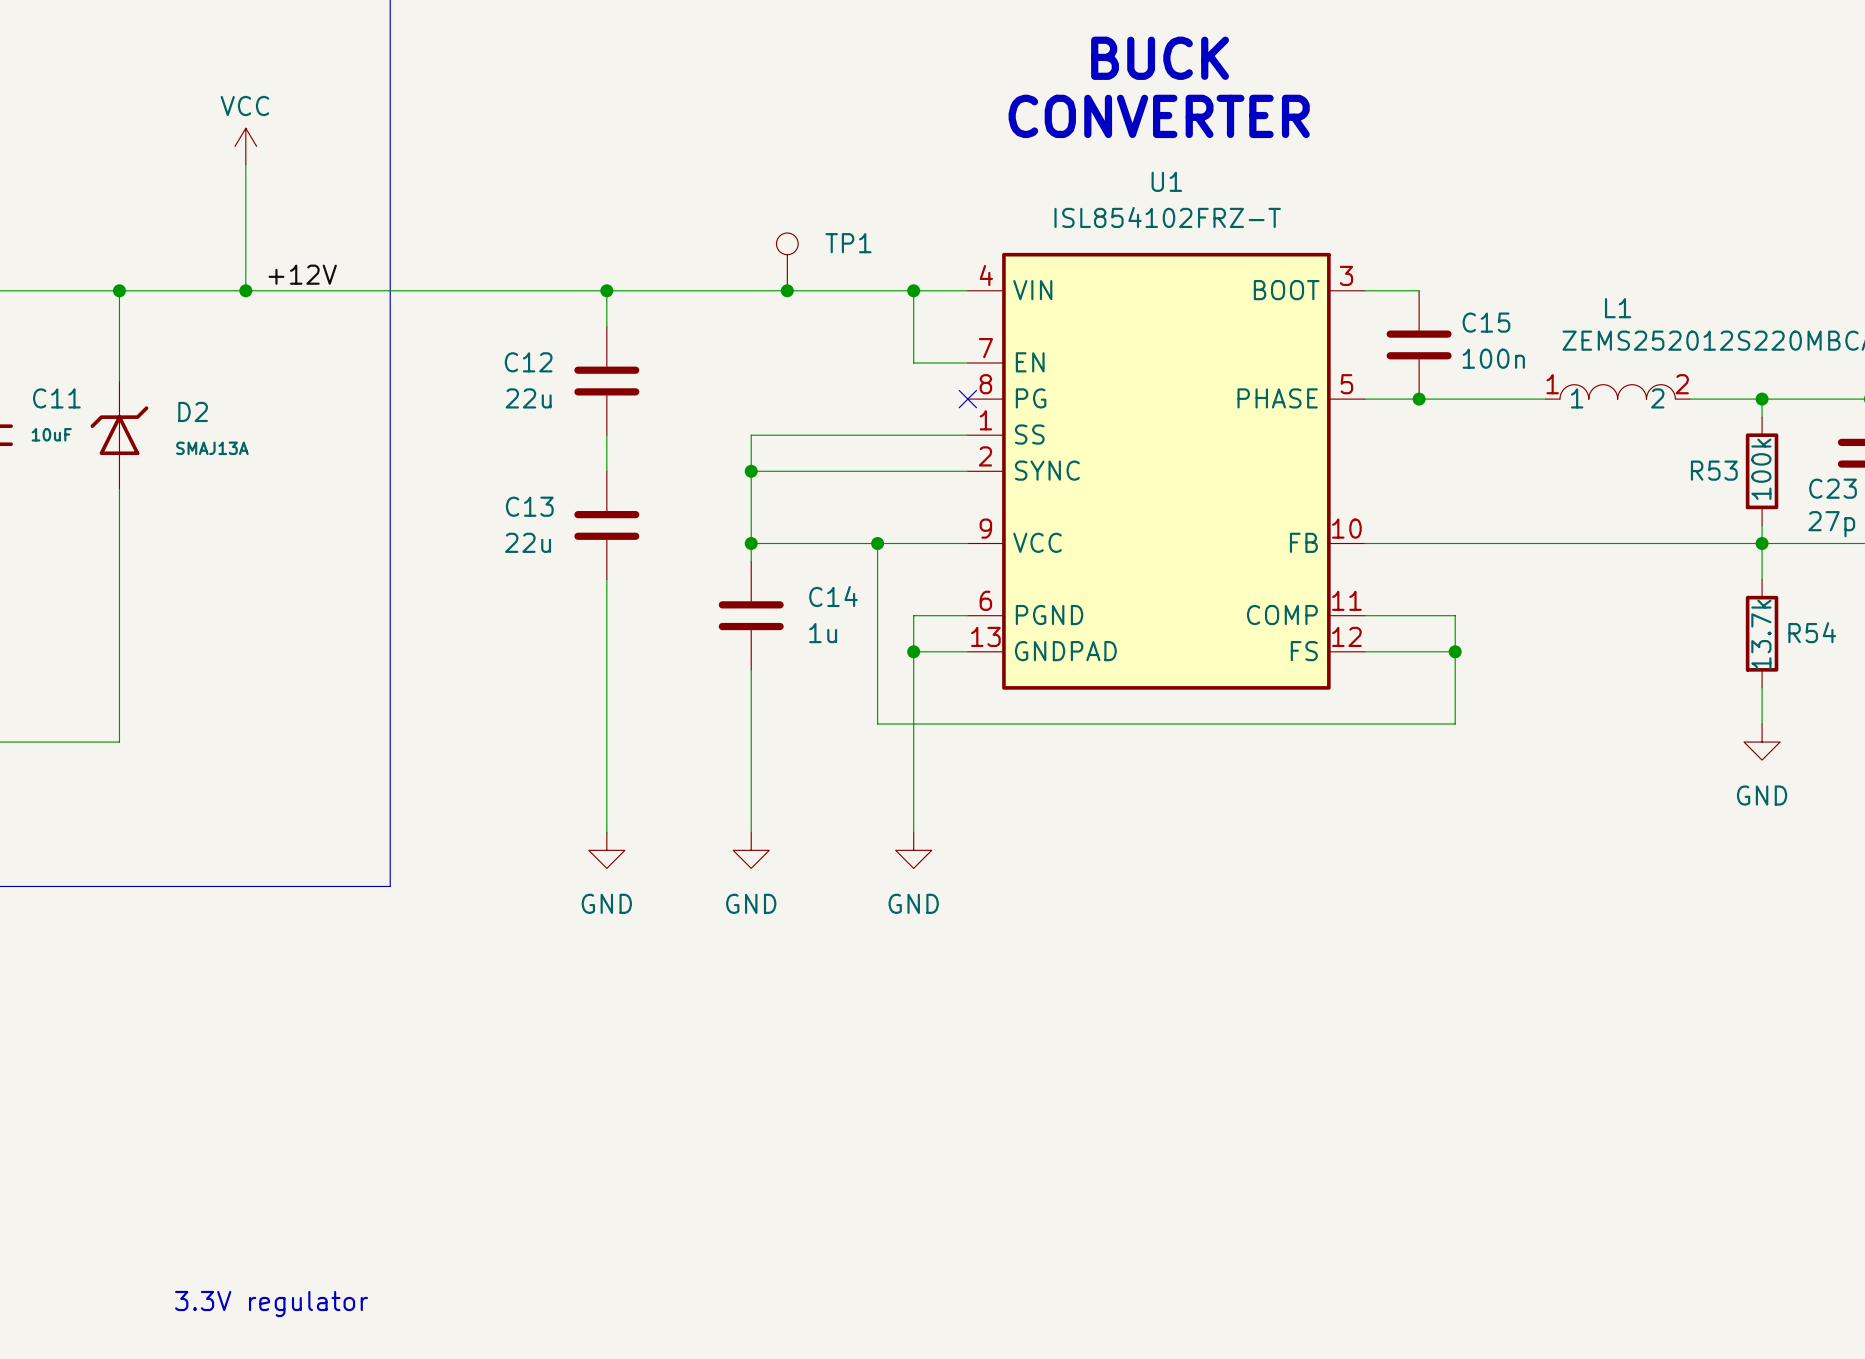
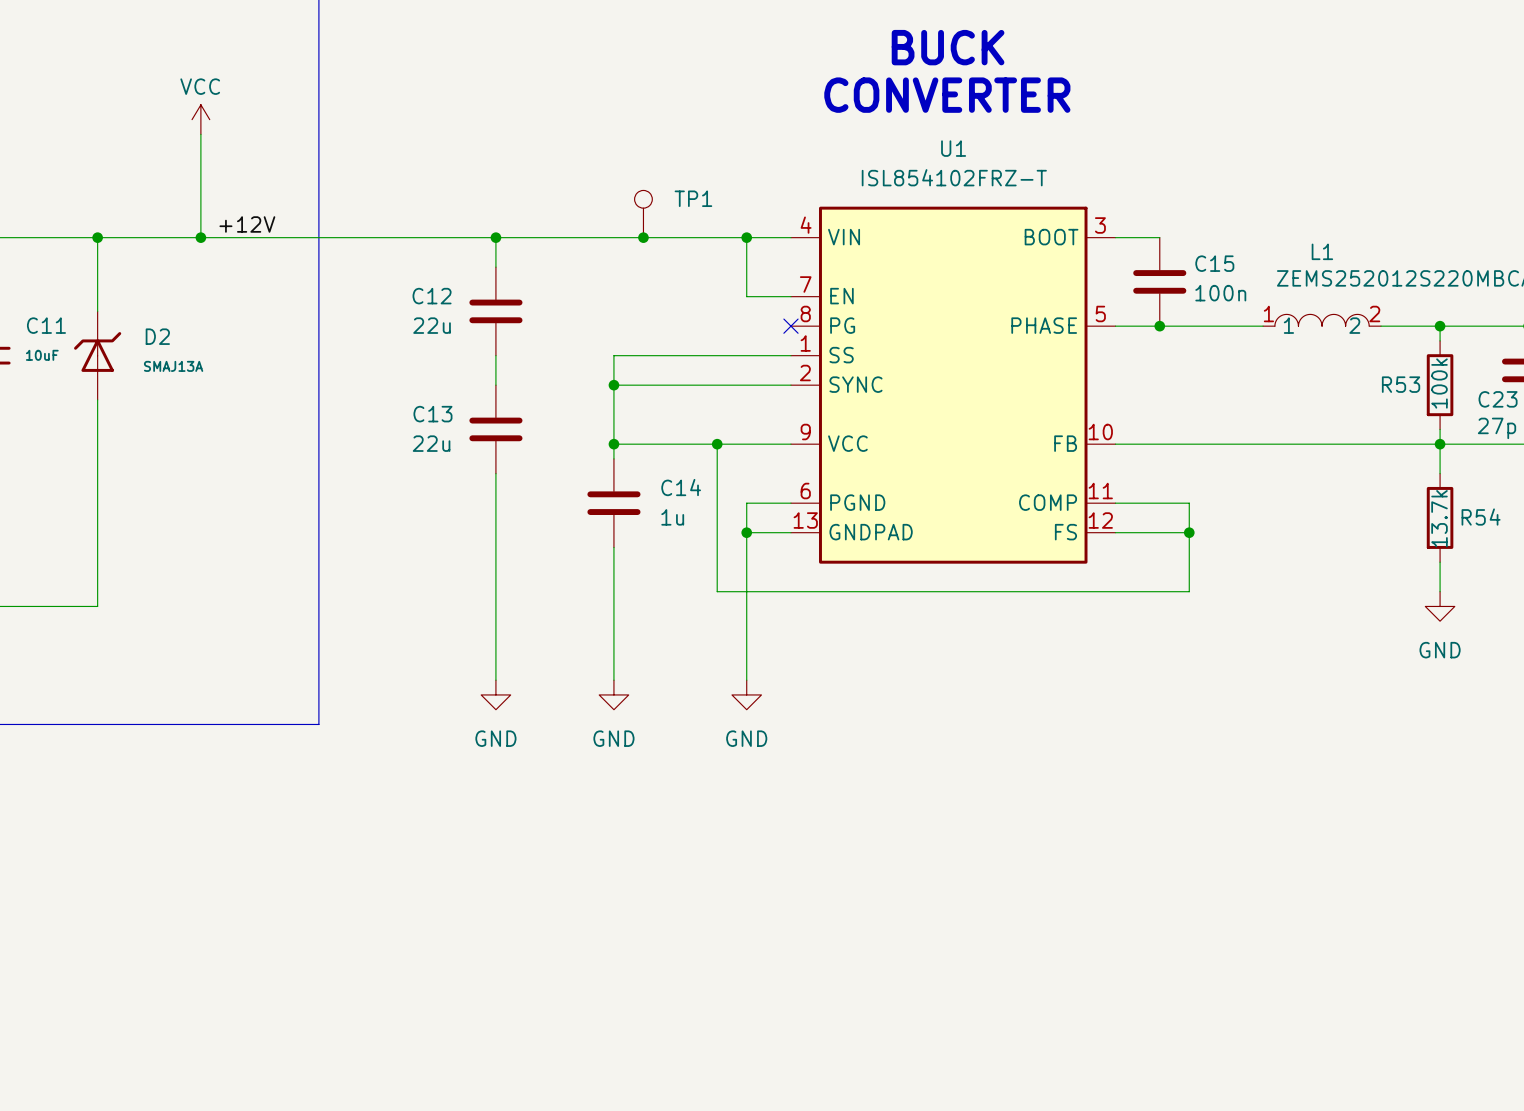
text: 3.3V regulator (271, 1304) -> none

